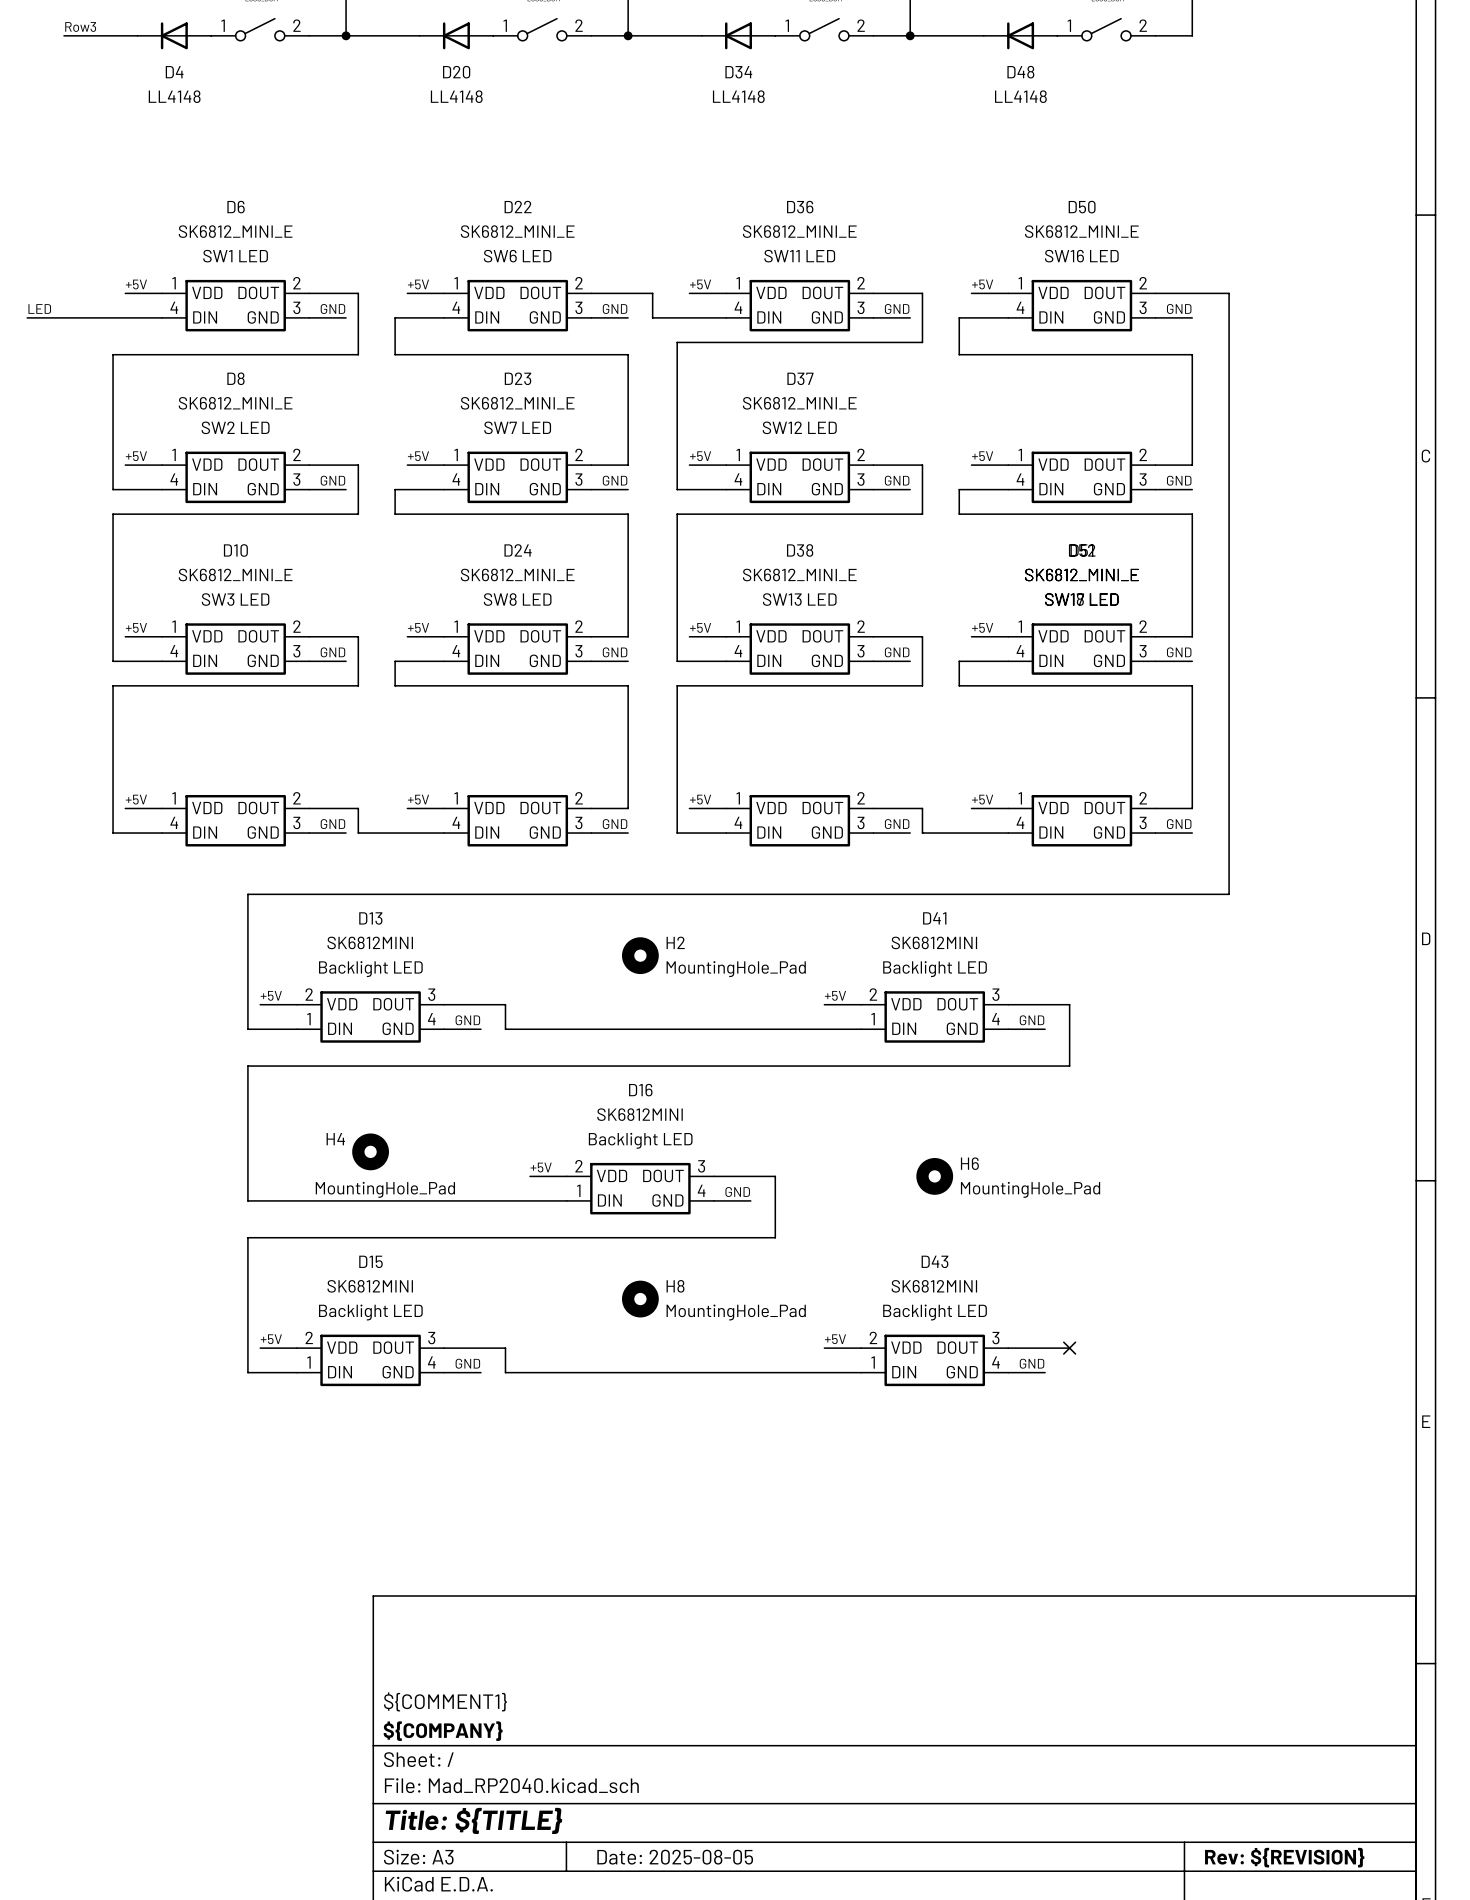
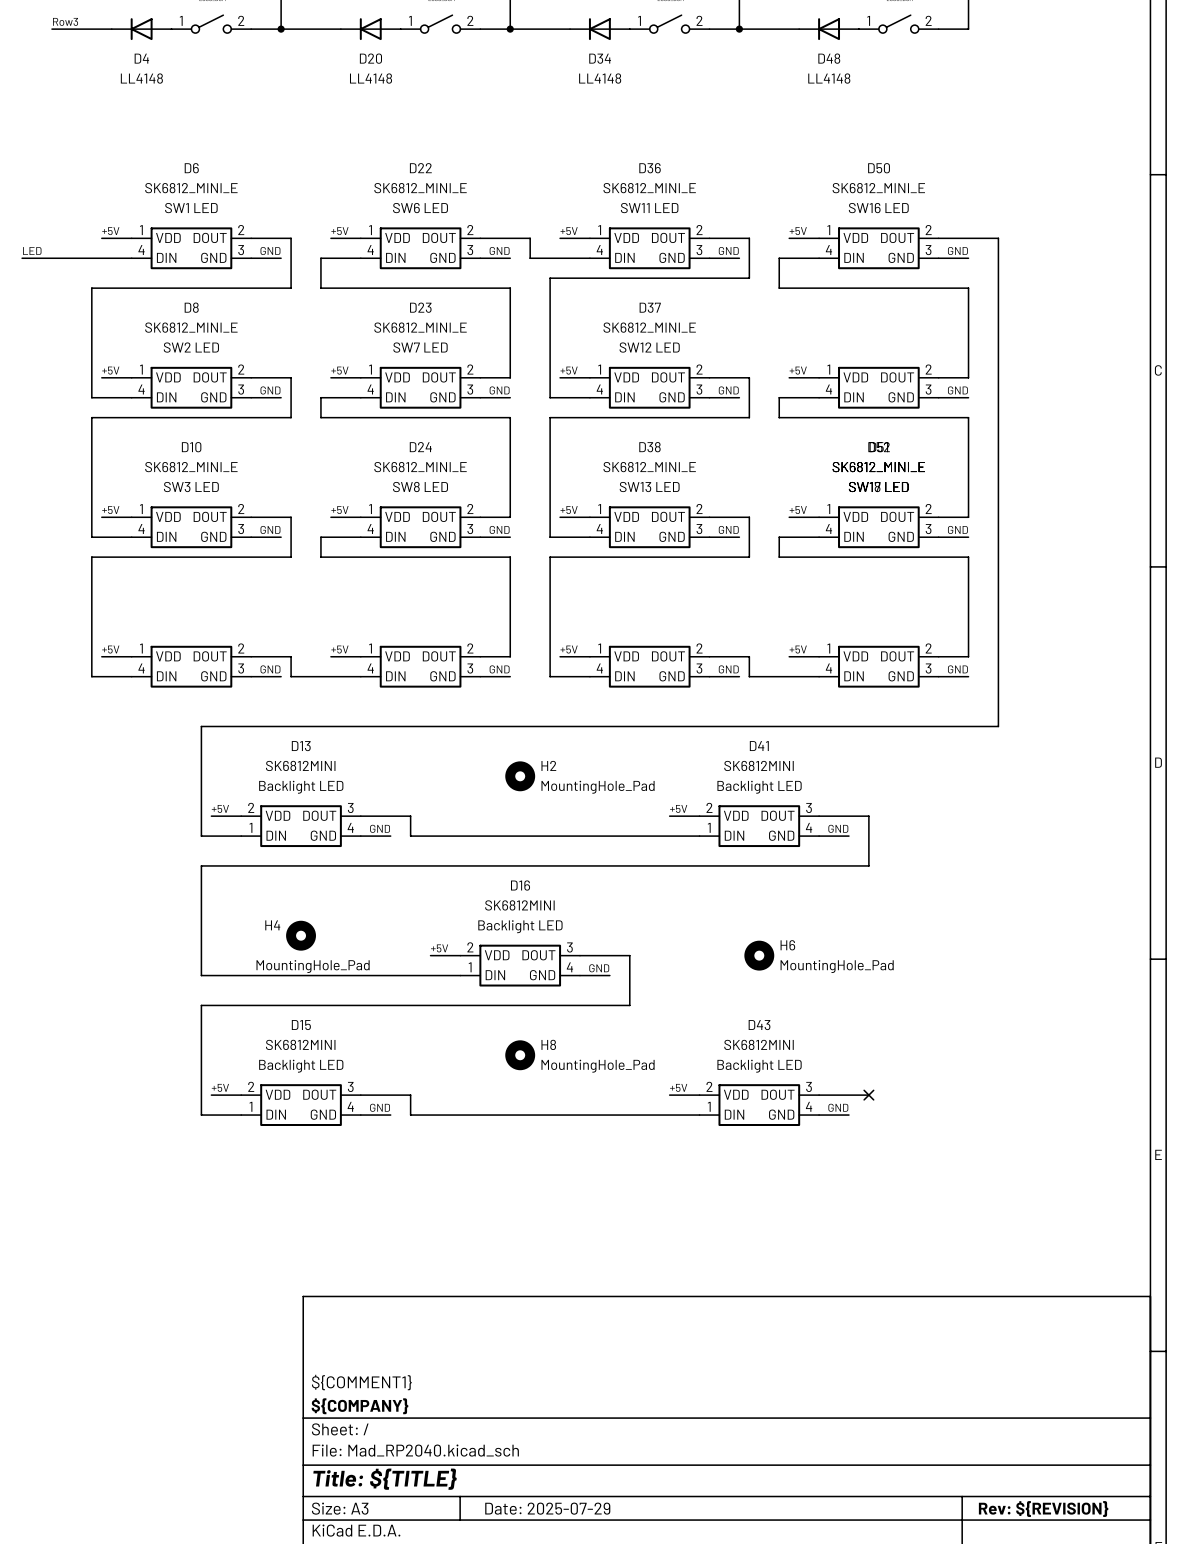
title block: Date: 2025-08-05 (675, 1857) -> Date: 2025-07-29 (547, 1508)

